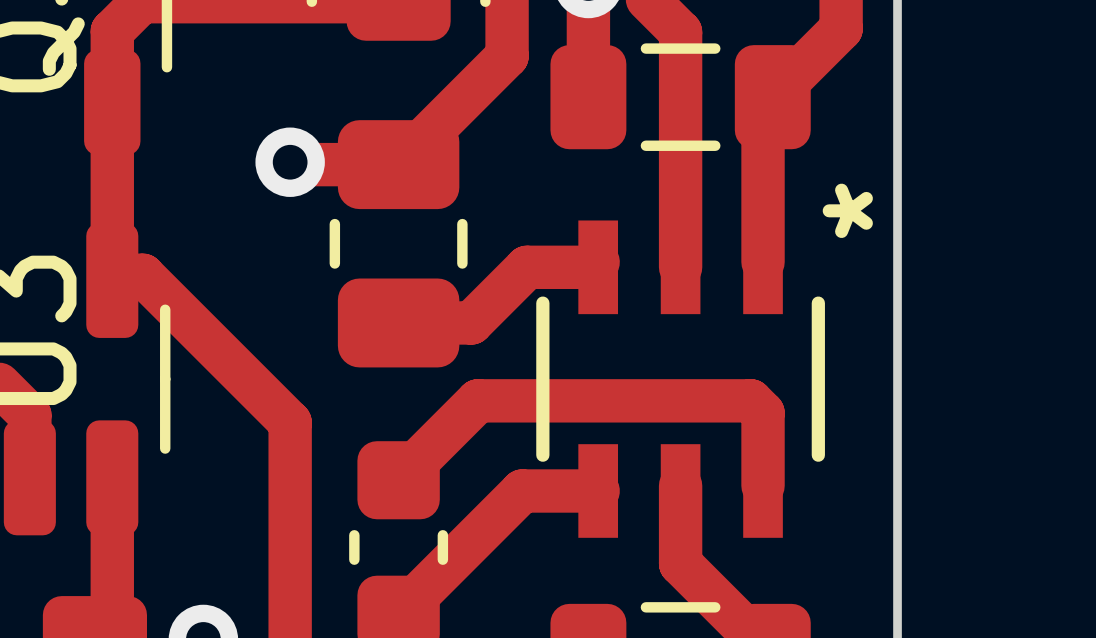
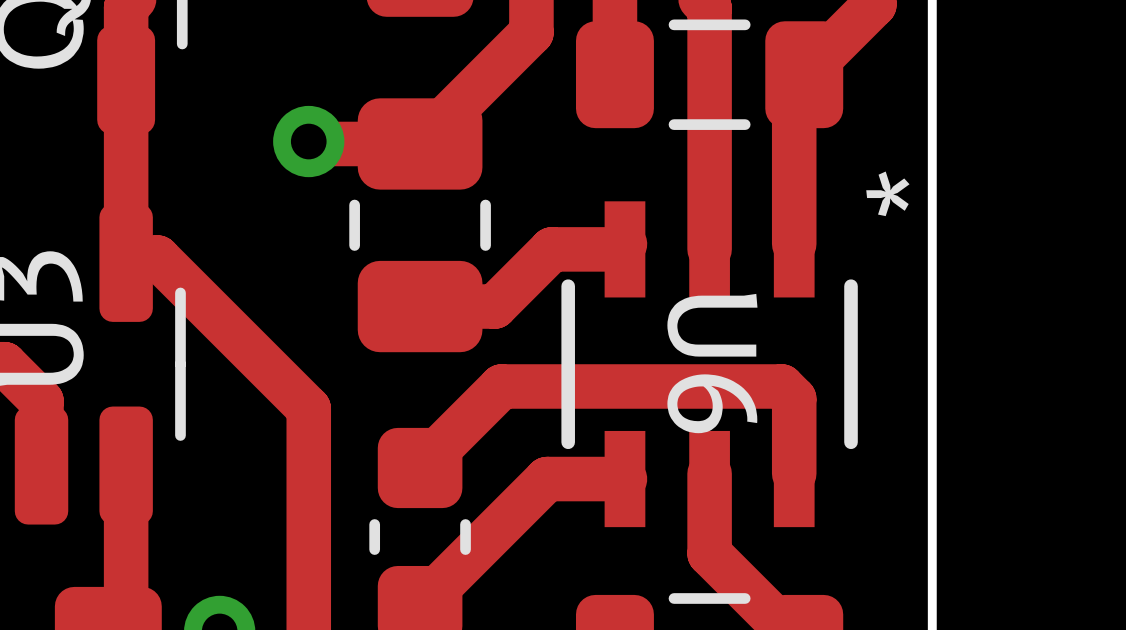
U6 name: none -> U6 (712, 363)

